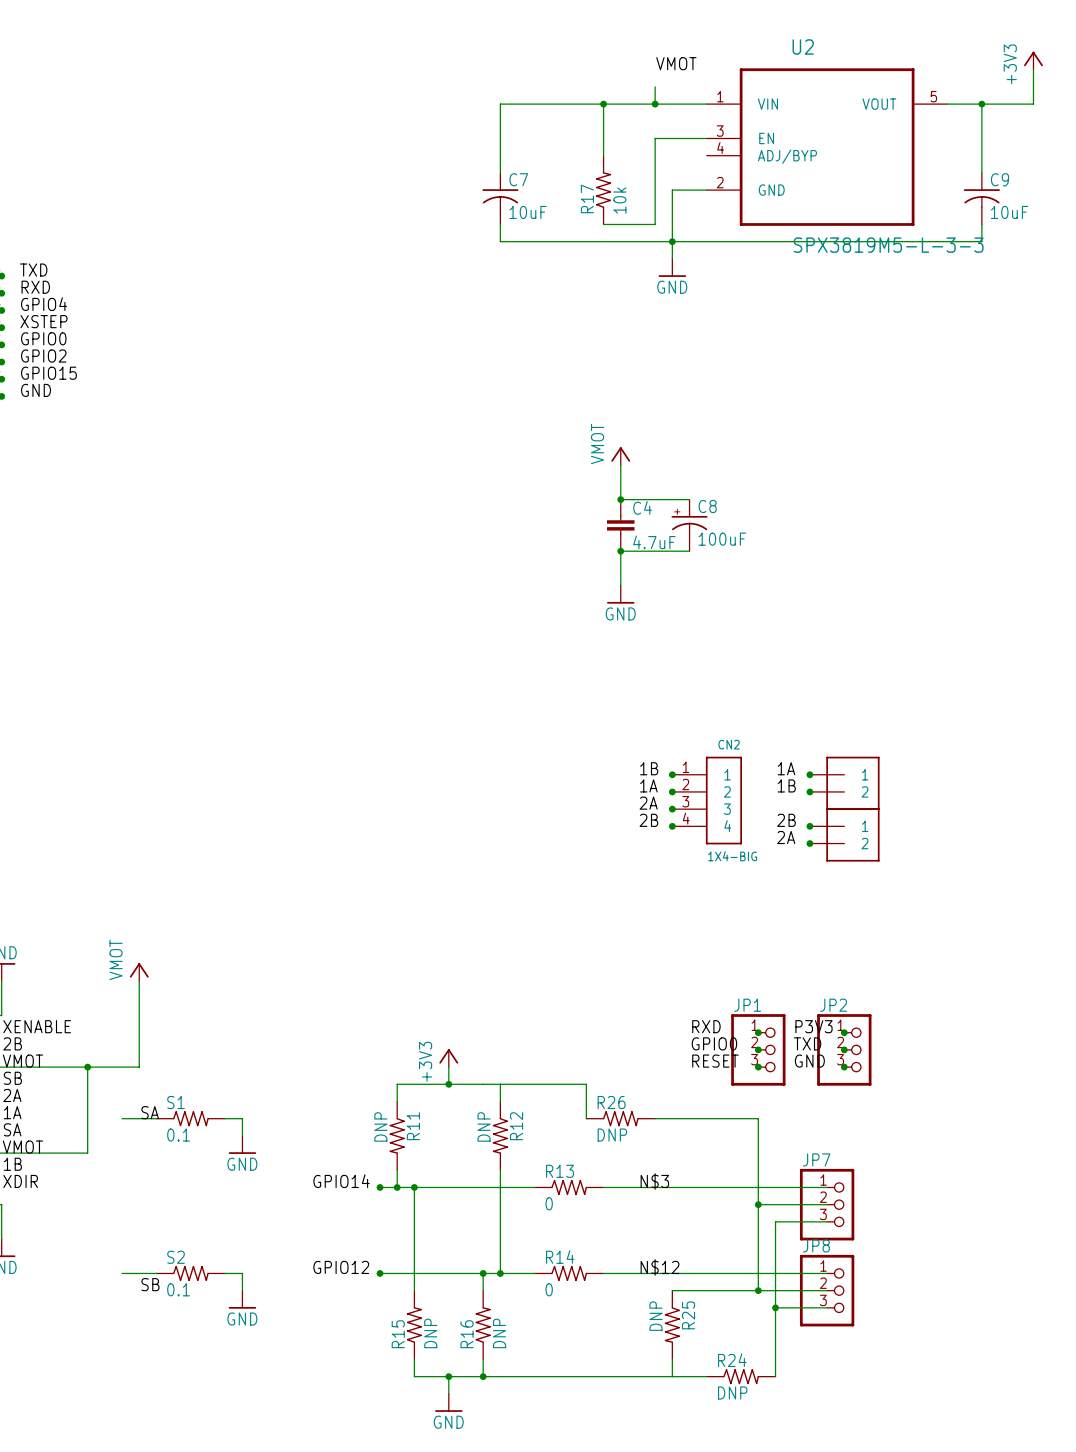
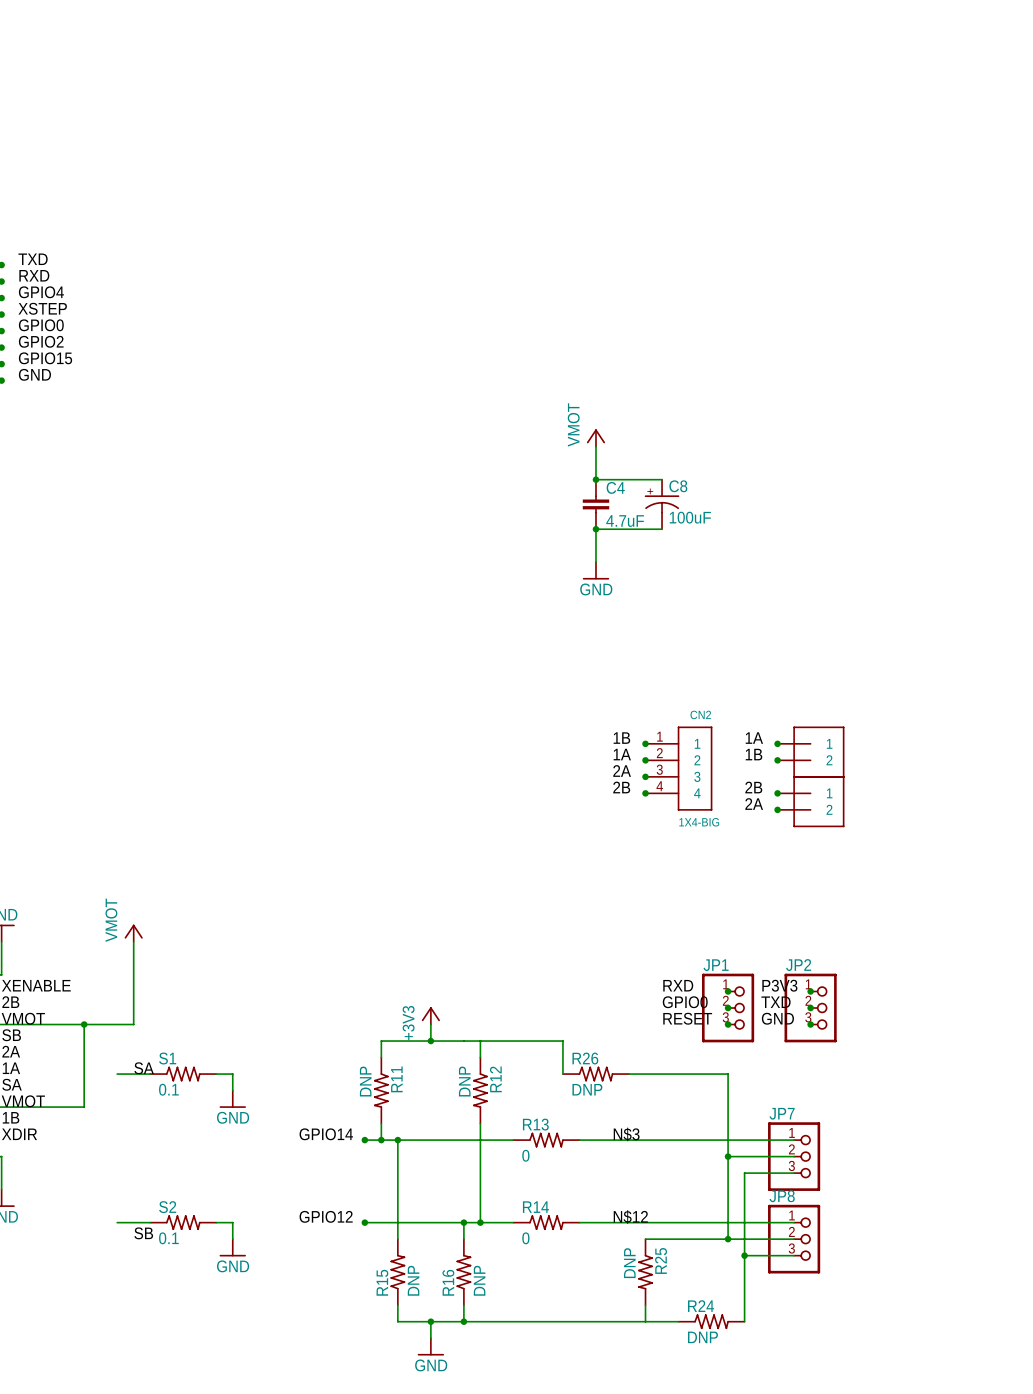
power symbol: +3V3 (1033, 60) -> none
label: VMOT (676, 63) -> none
wire: (1033, 69) (1033, 104) (947, 104) -> none
wire: (655, 86) (655, 104) -> none
wire: (603, 104) (603, 155) -> none
junction: (603, 104) -> none
junction: (655, 104) -> none
wire: (706, 104) (500, 104) (500, 172) -> none
wire: (981, 104) (981, 172) -> none
junction: (981, 104) -> none
wire: (706, 138) (655, 138) (655, 224) (603, 224) -> none
U2: SPX3819M5-L-3-3 (827, 147) -> none
R17: 10k (603, 190) -> none
wire: (706, 190) (672, 190) (672, 258) -> none
C7: 10uF (500, 198) -> none
C9: 10uF (981, 198) -> none
wire: (500, 224) (500, 241) (981, 241) (981, 224) -> none
junction: (672, 241) -> none
power symbol: GND (672, 267) -> none

